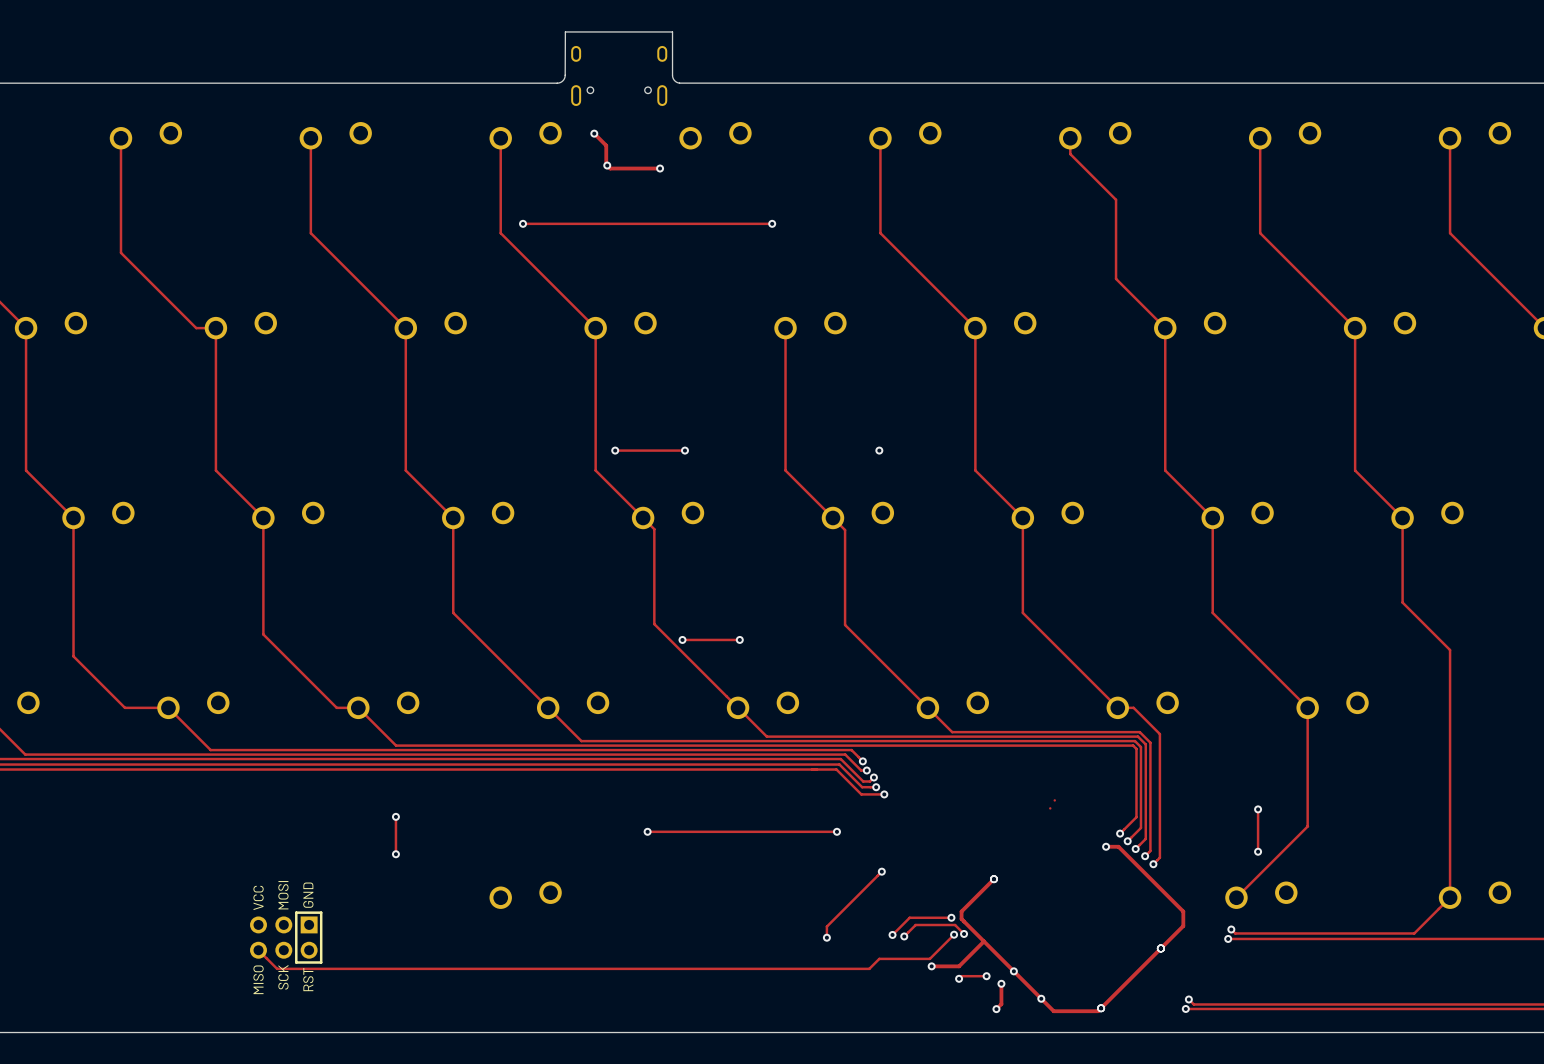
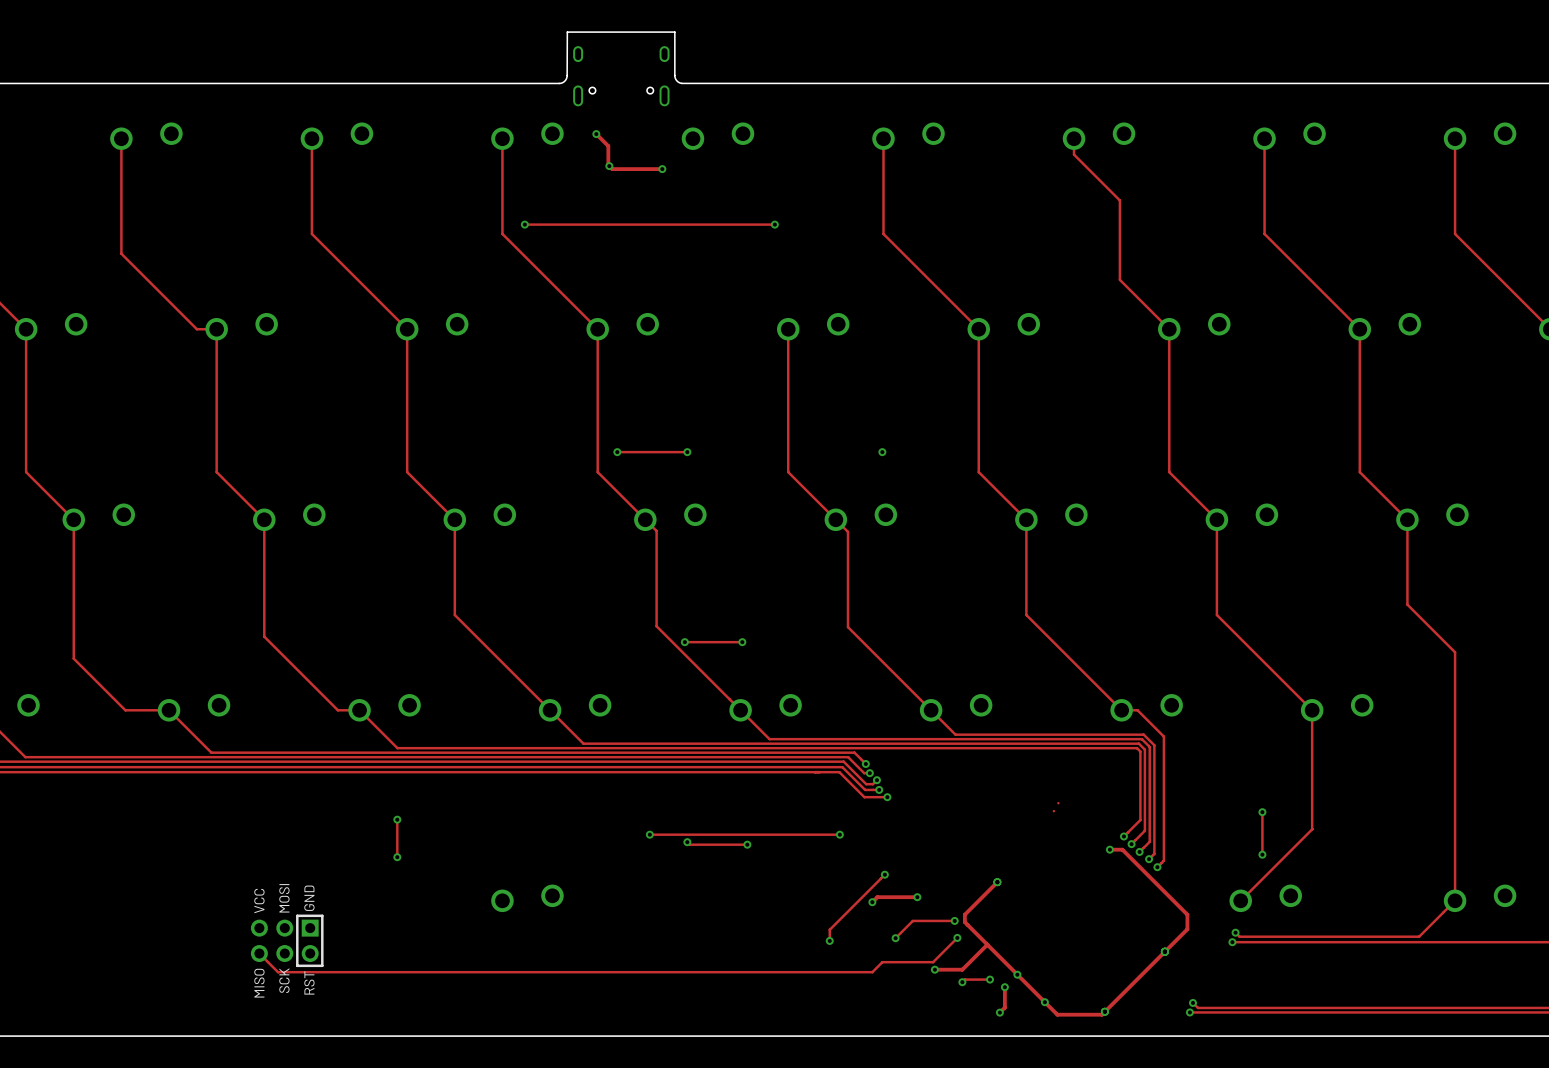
track: none -> (687, 842) (689, 844) (747, 844)
via: none -> (687, 842)
via: none -> (747, 844)
track: none -> (917, 897) (877, 897) (872, 902)
via: none -> (917, 897)
via: none -> (872, 902)
track: (964, 933) (955, 925) (915, 925) (904, 936) -> none
via: (964, 933) -> none
via: (904, 936) -> none

